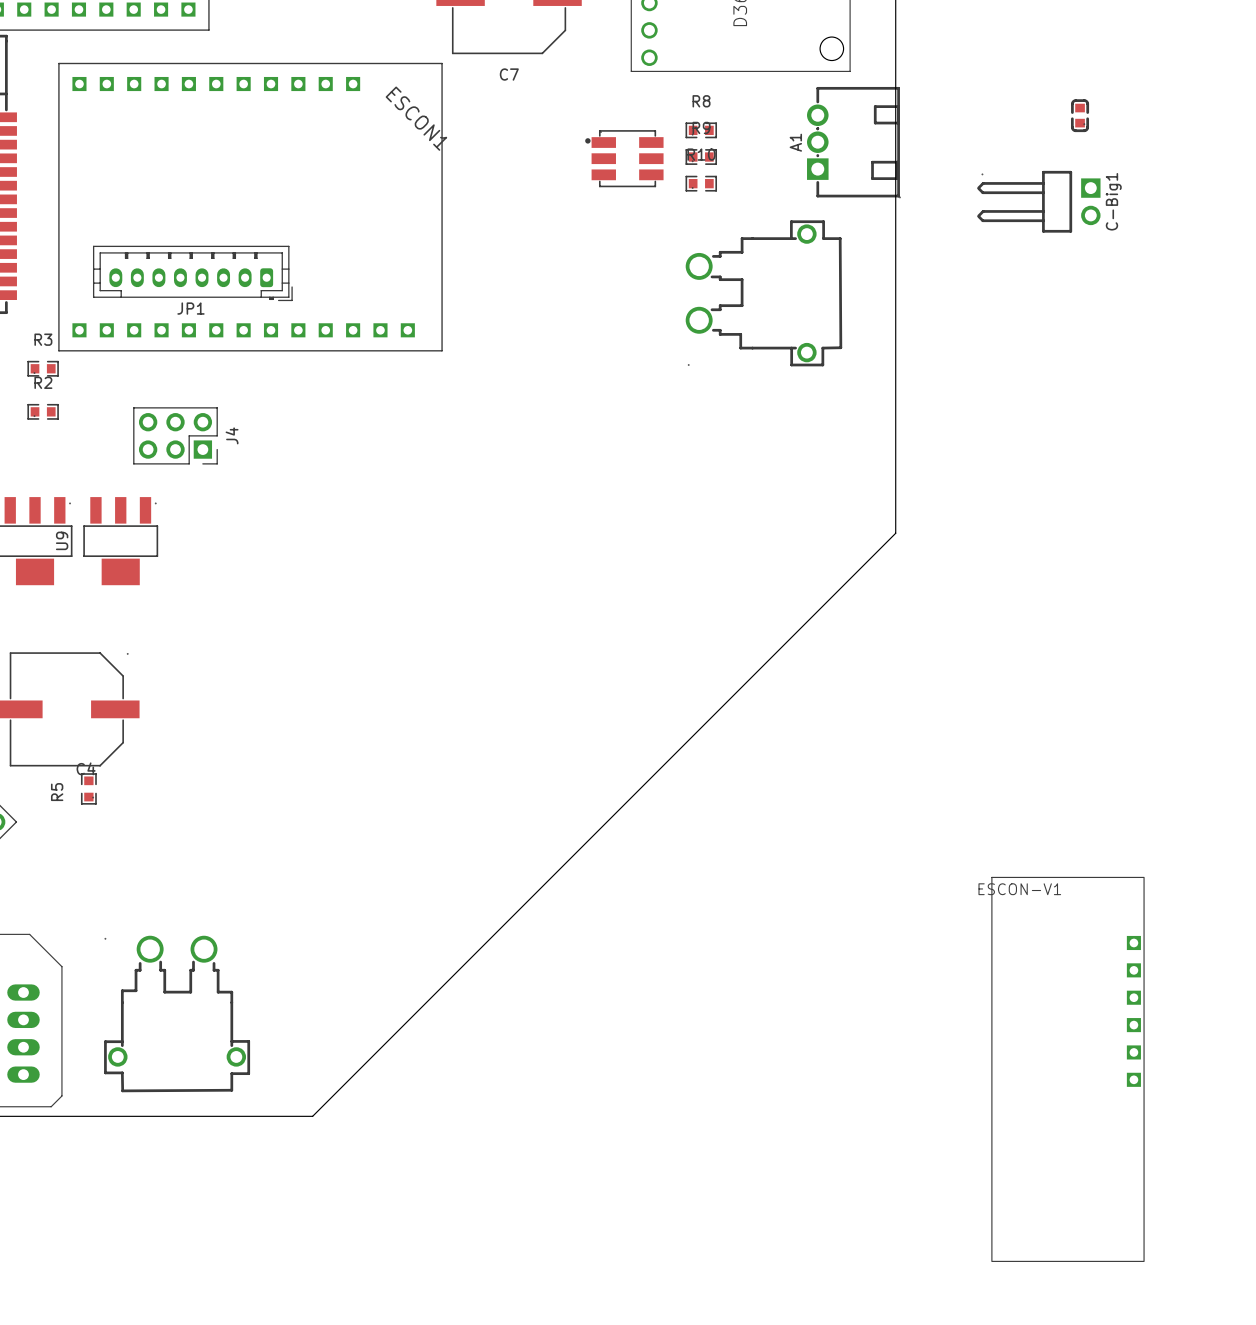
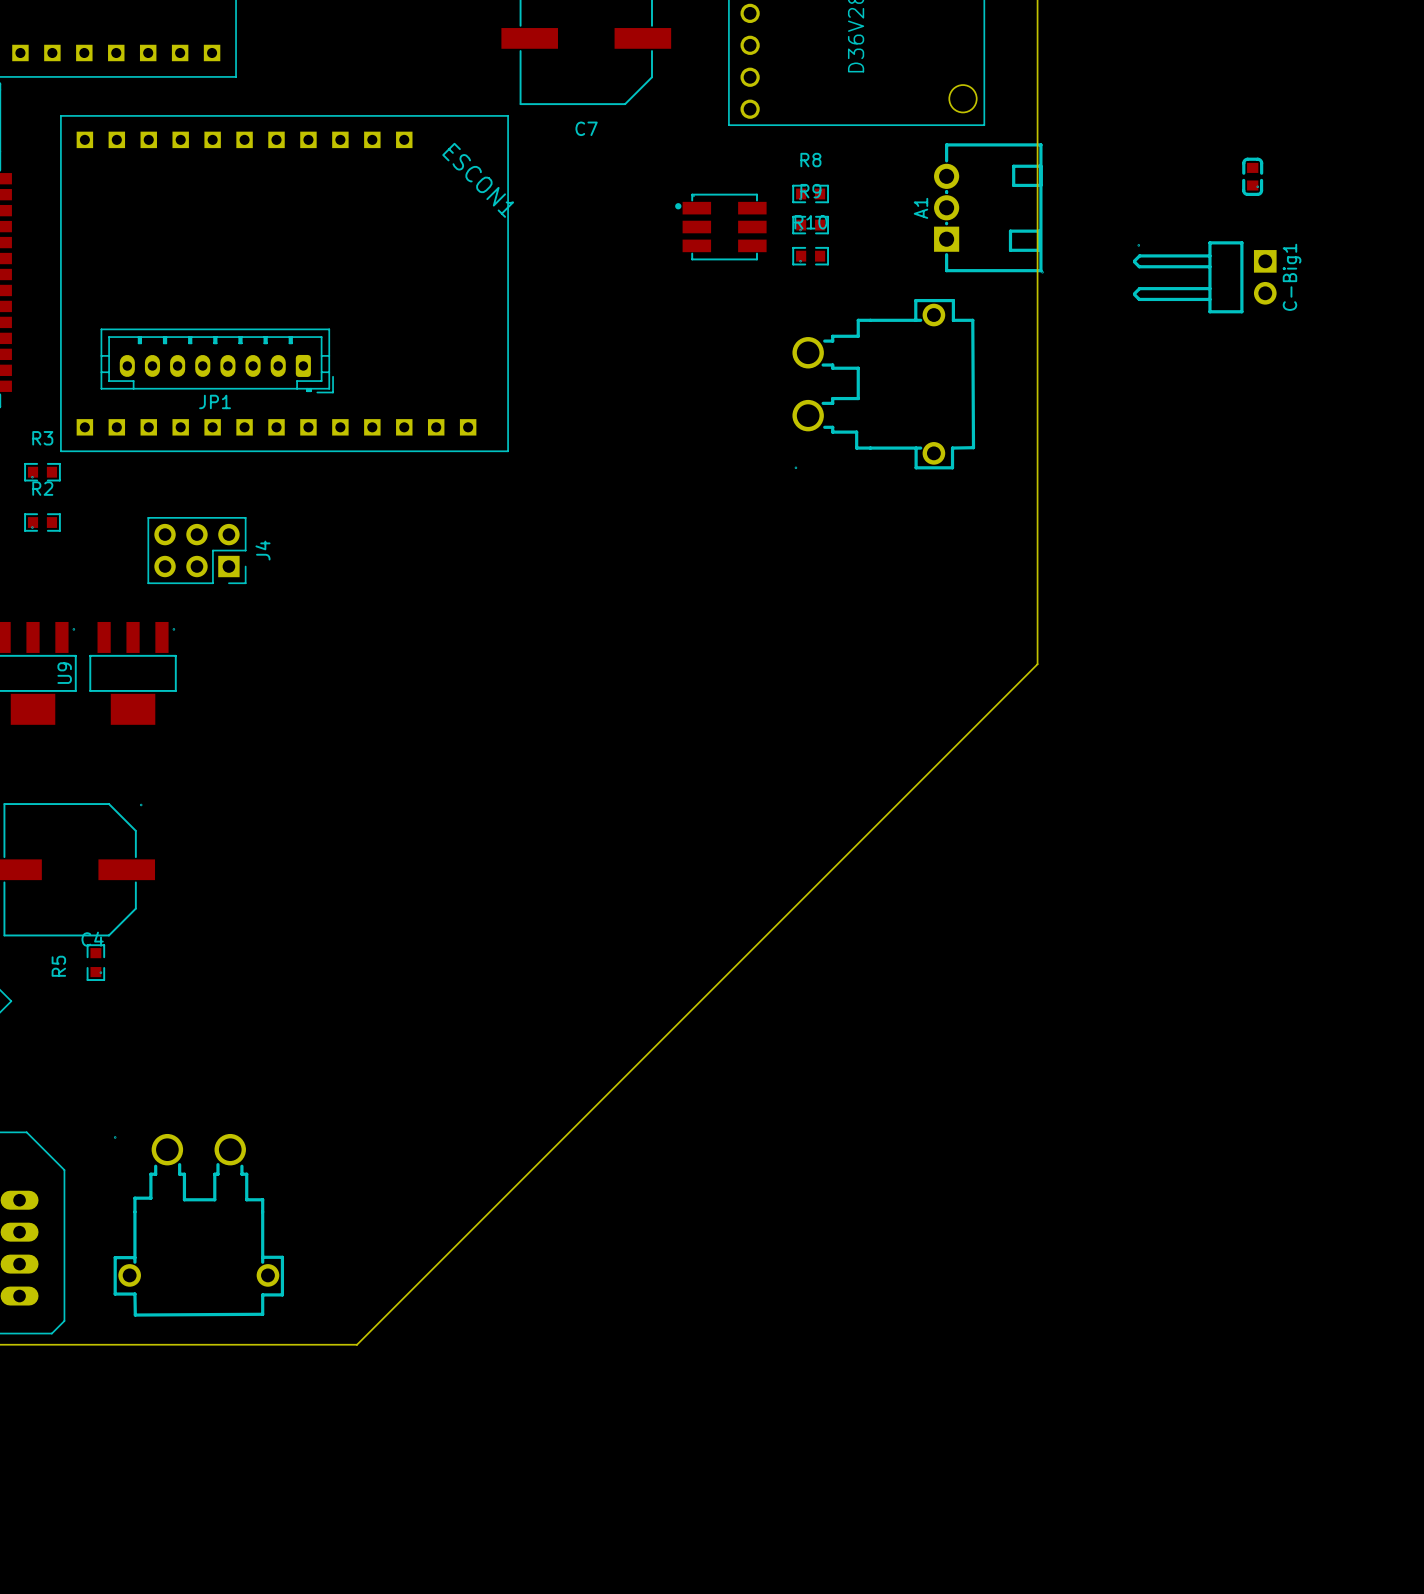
ESCON-V1: (1067, 1069) -> none

